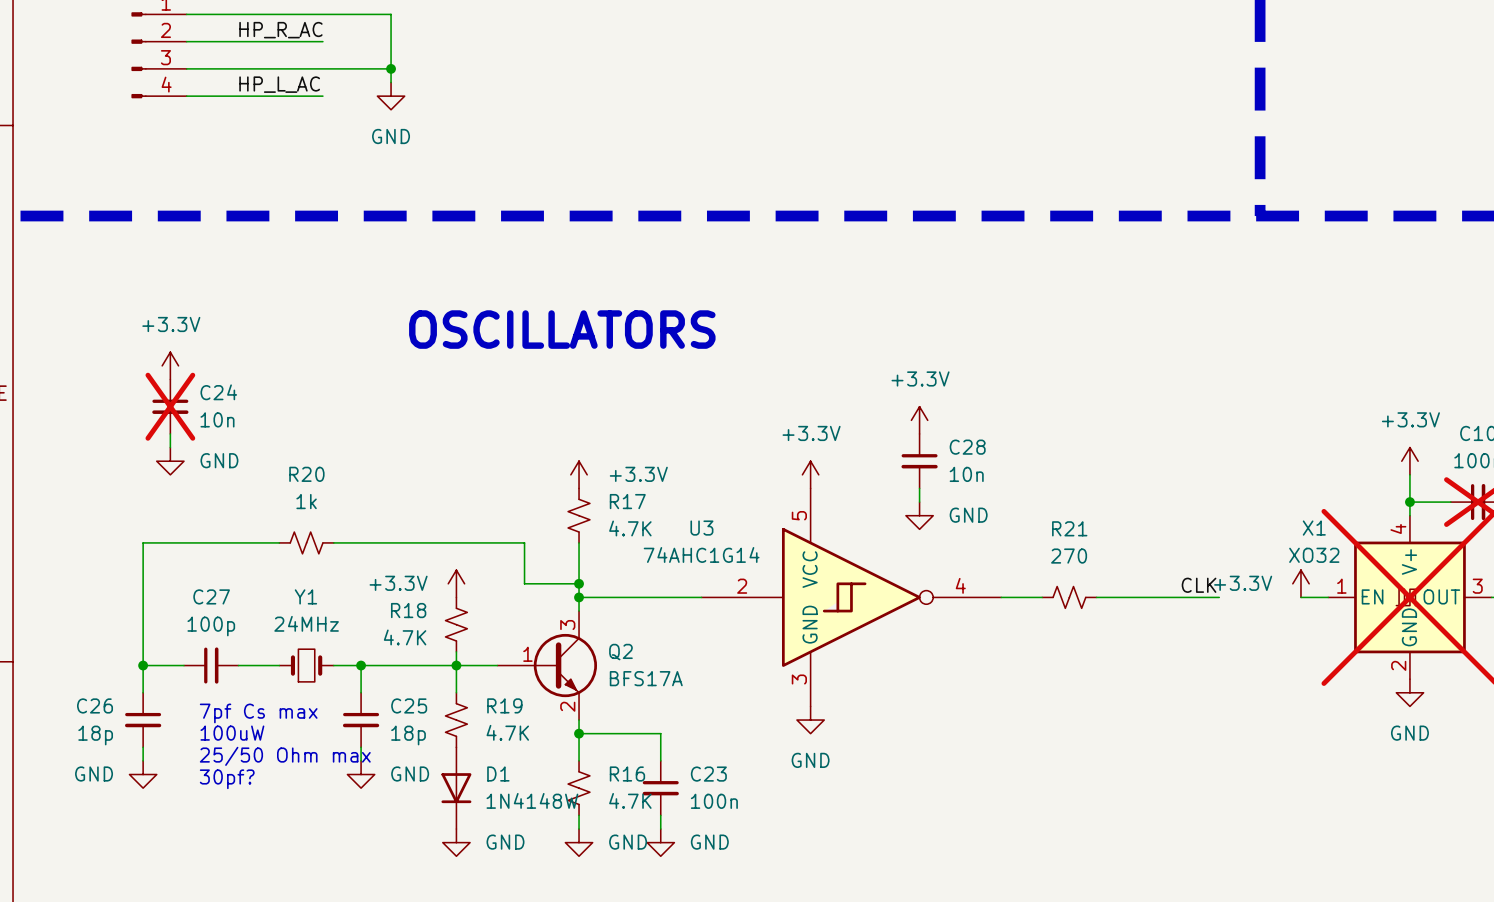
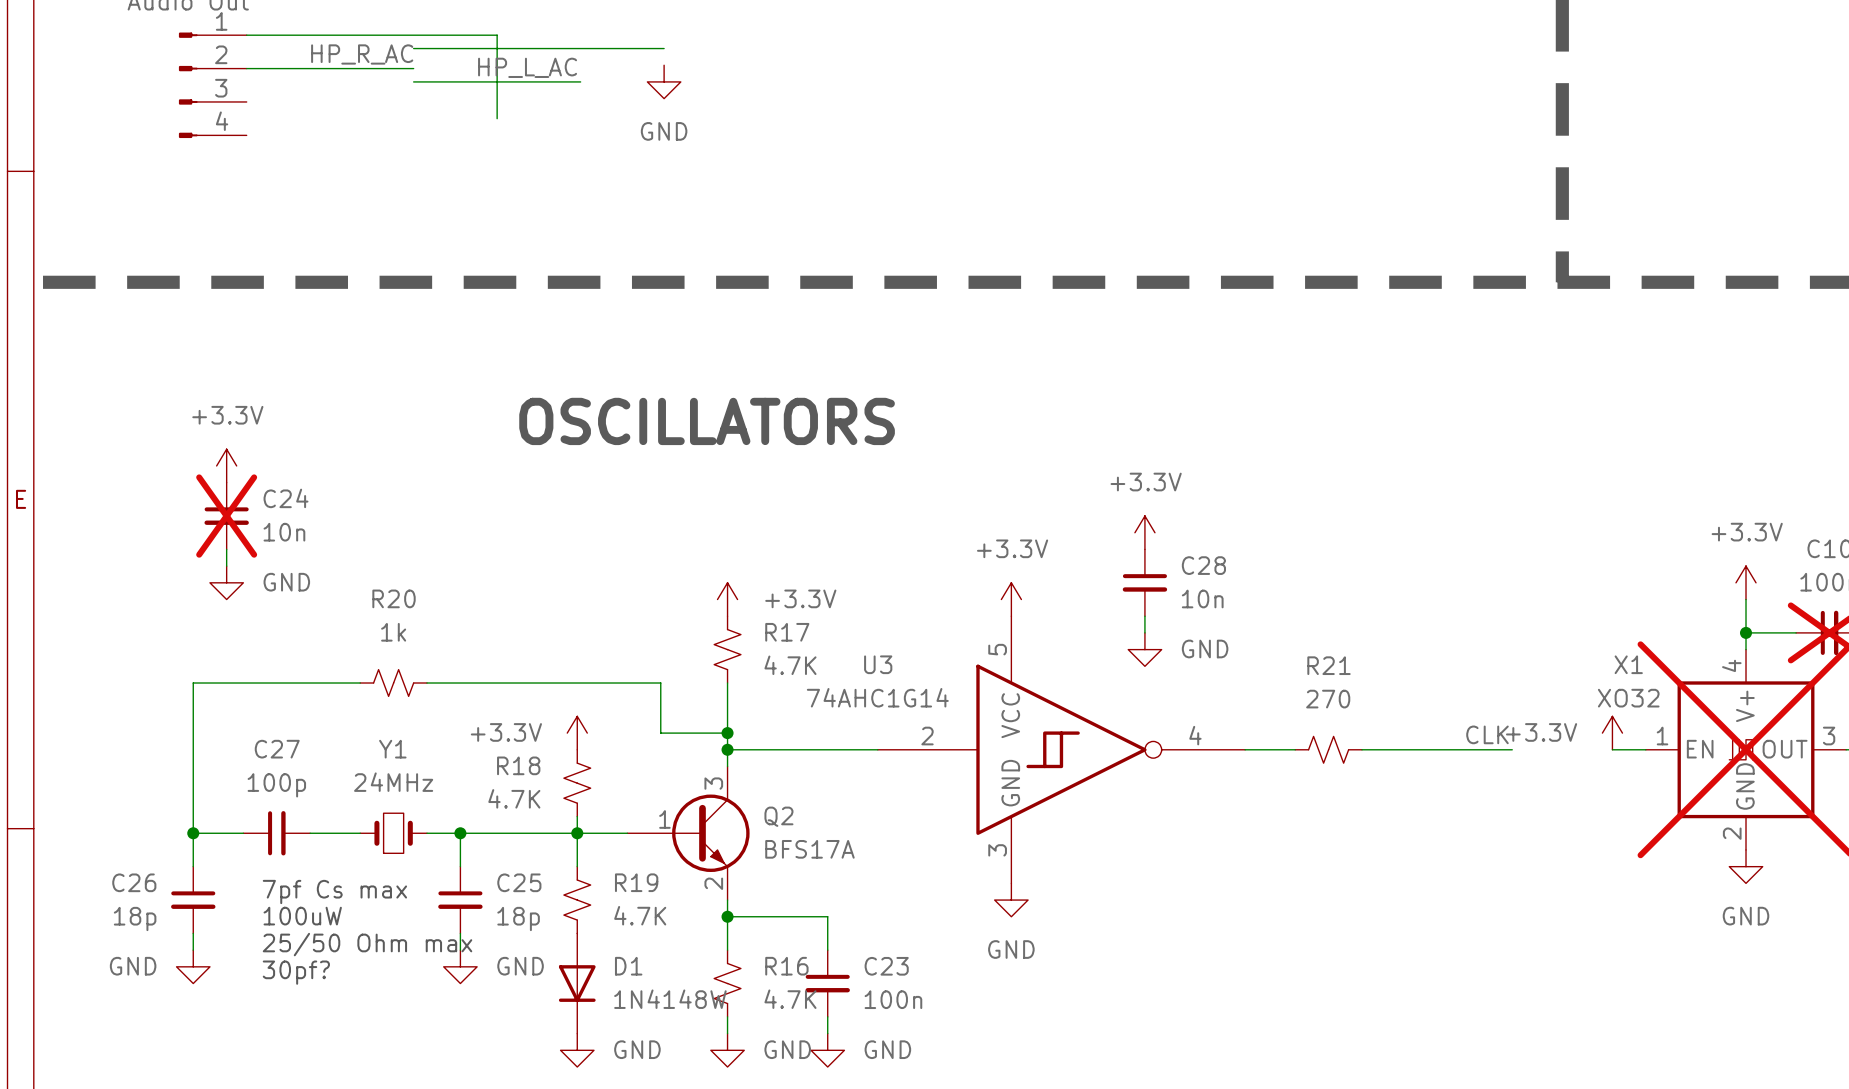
power symbol: none -> GND (664, 81)
wire: (186, 68) (391, 68) -> (413, 48) (664, 48)
junction: (391, 68) -> none
label position: HP_L_AC (279, 84) -> HP_L_AC (527, 67)
wire: (186, 96) (322, 96) -> (413, 81) (580, 81)
power symbol: GND (391, 96) -> none

